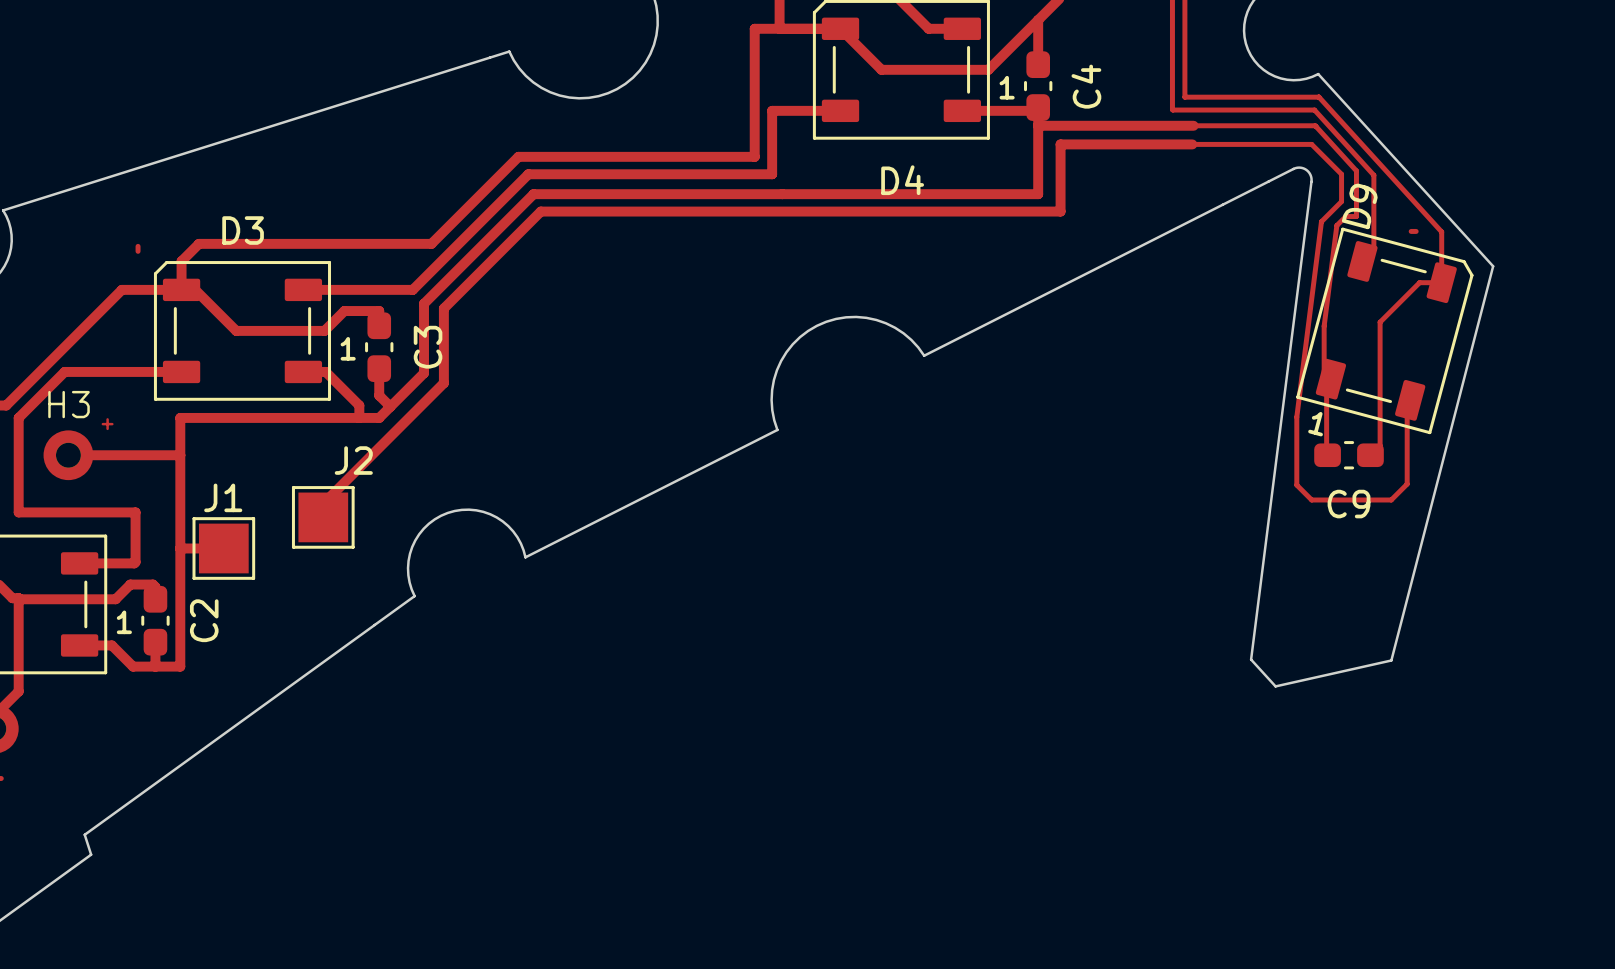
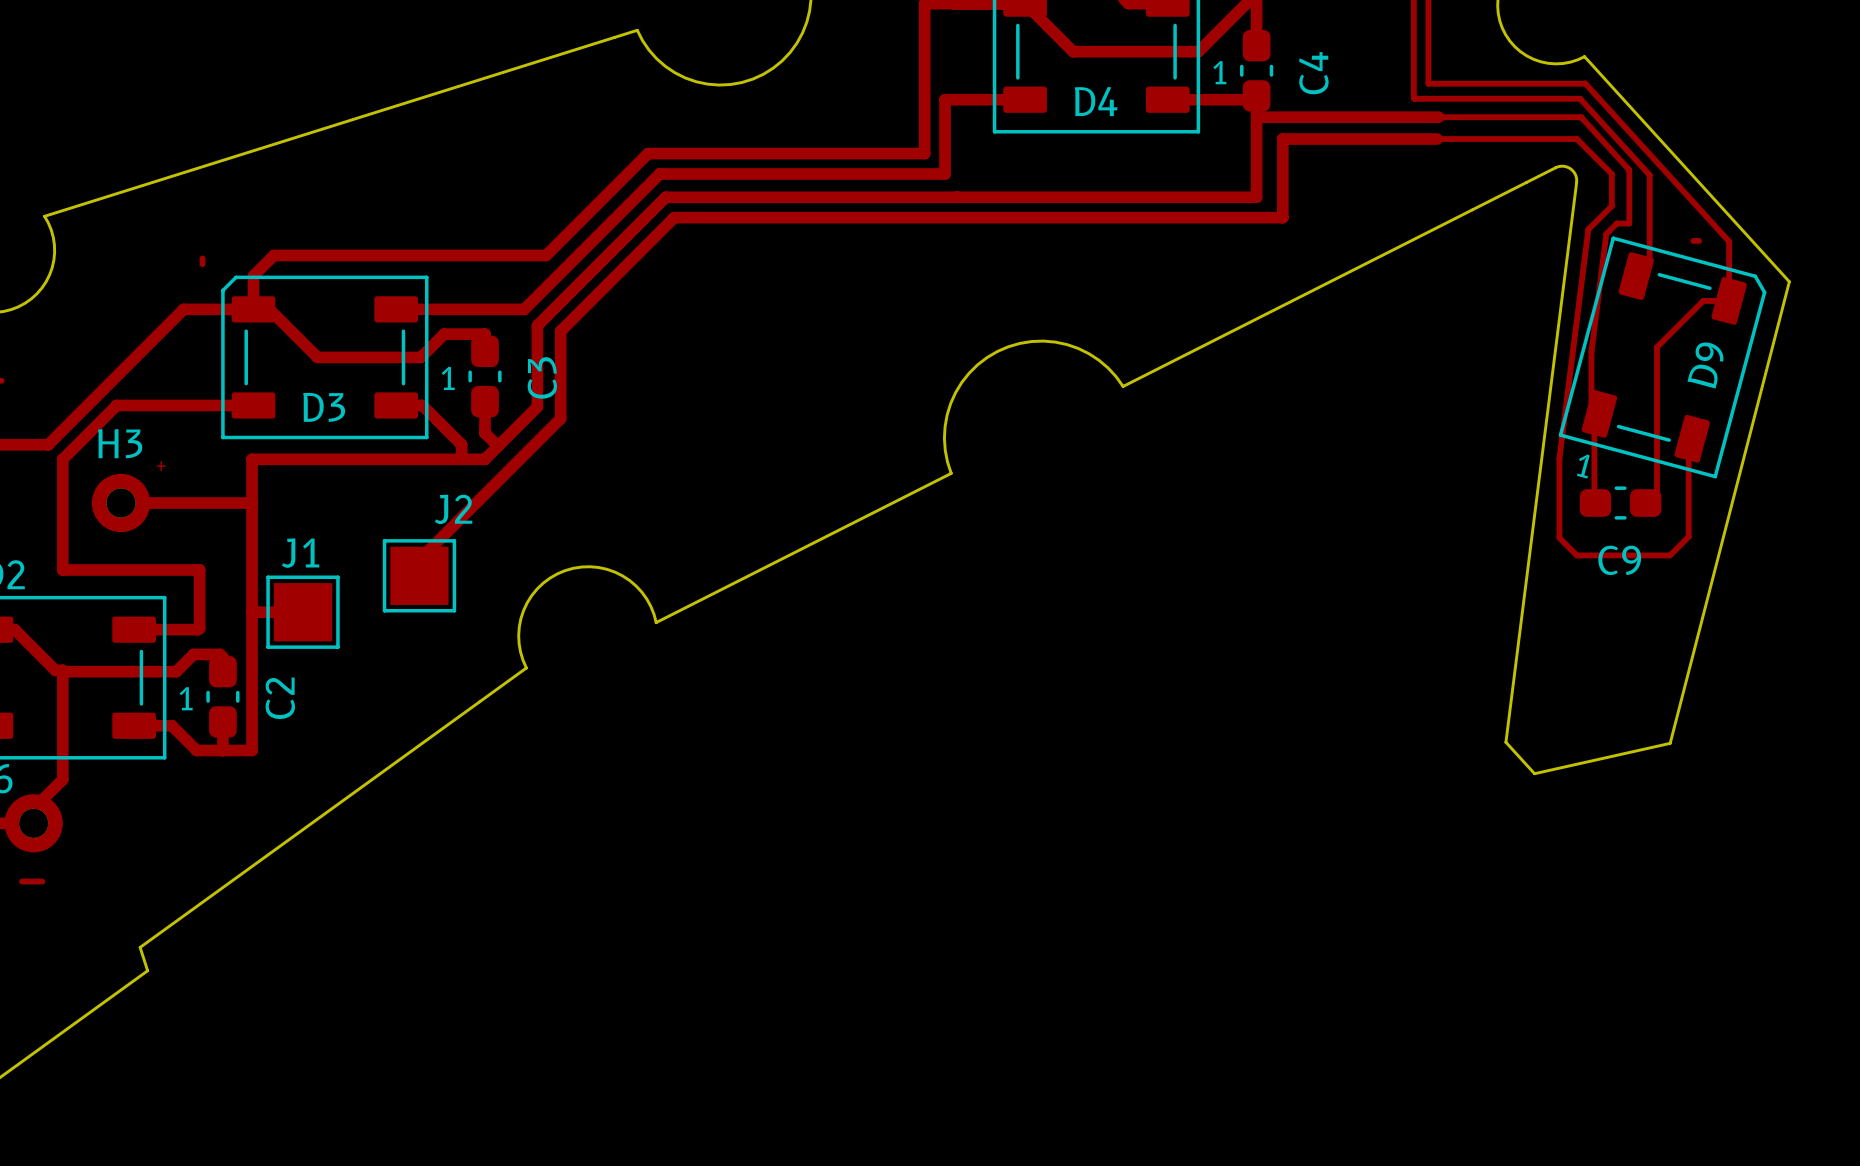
D4 name position: D4 (902, 180) -> D4 (1096, 101)
D9 name position: D9 (1359, 206) -> D9 (1705, 365)
D3 name position: D3 (243, 230) -> D3 (324, 407)

